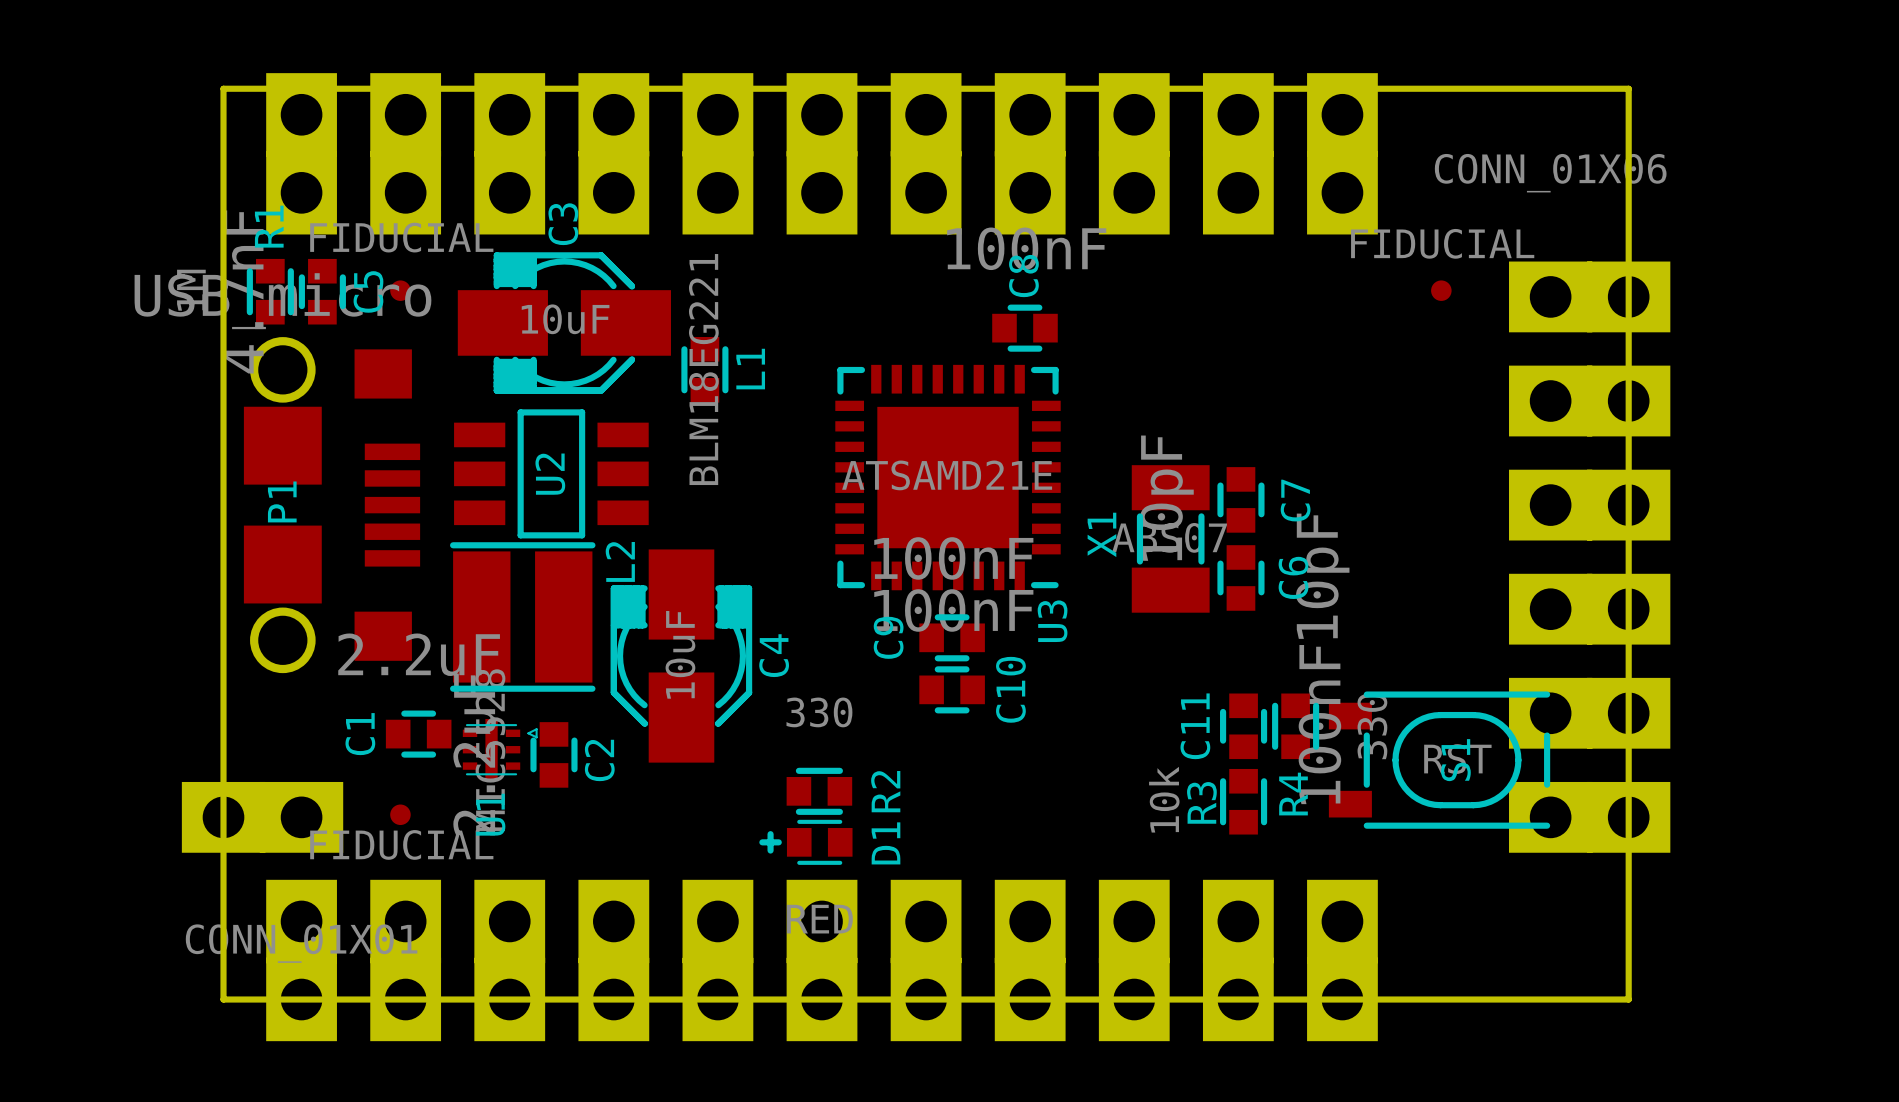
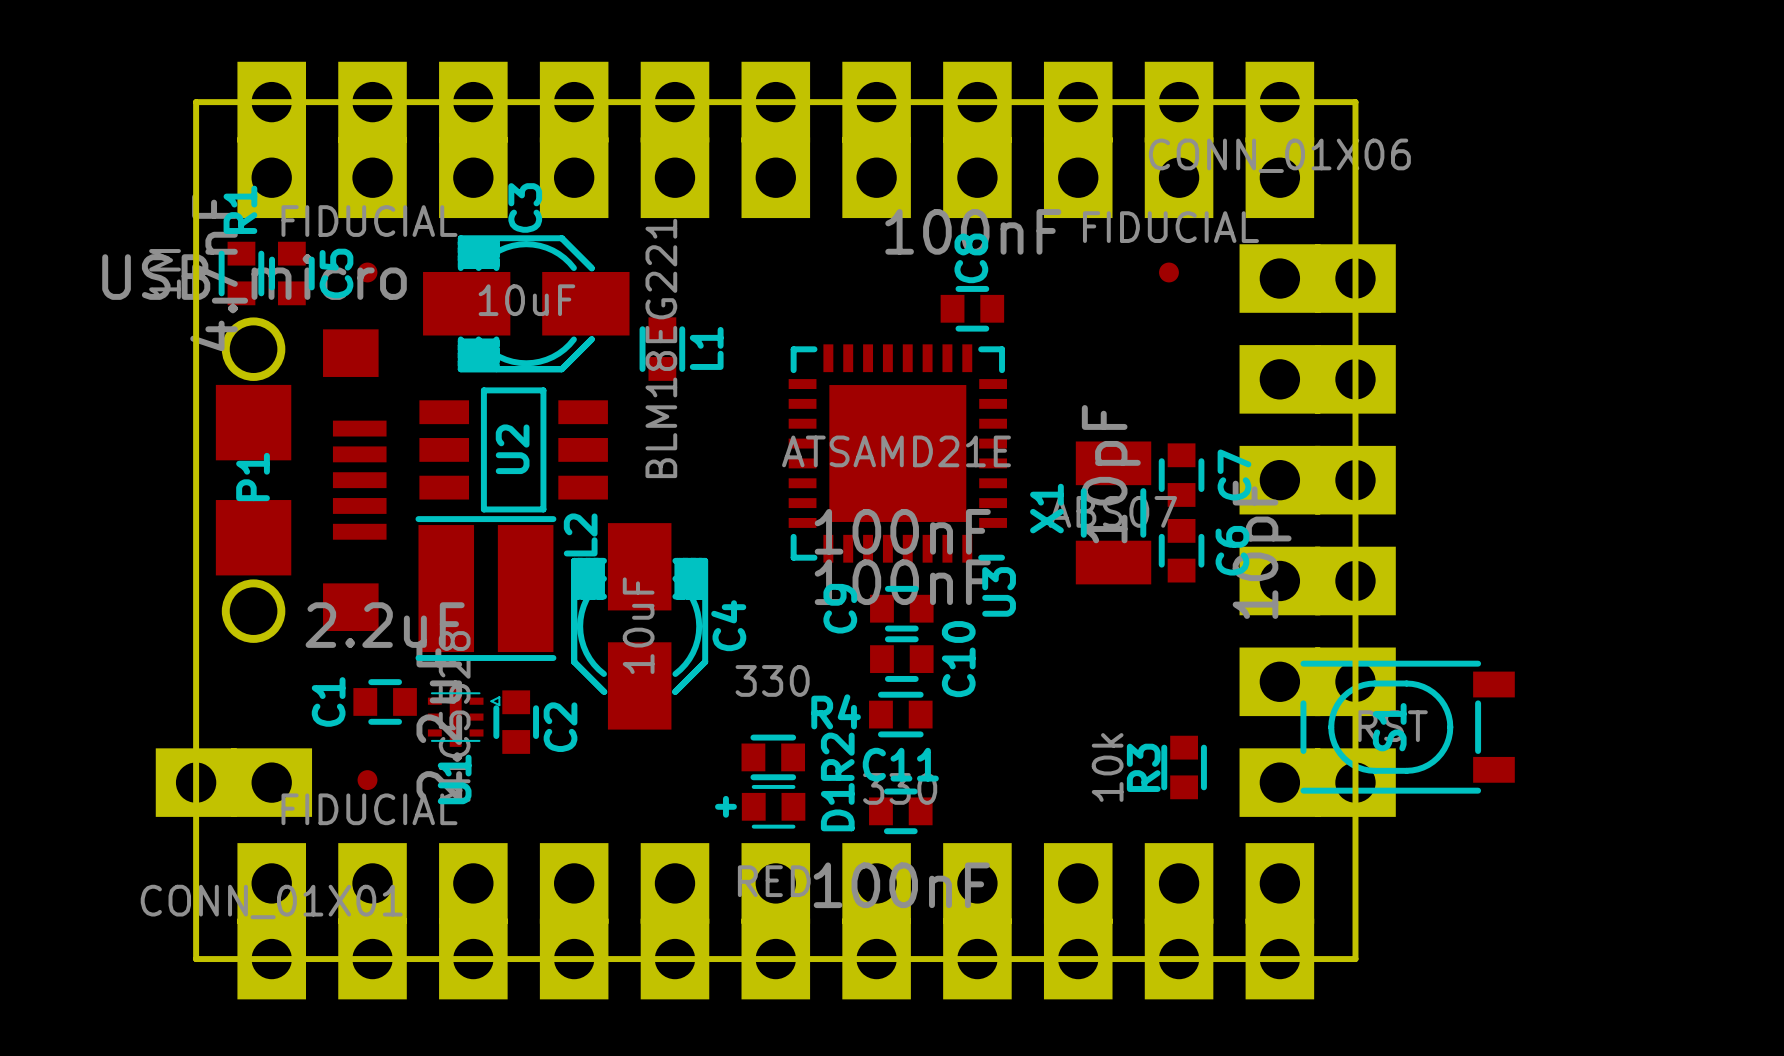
board edge: (223, 114) (223, 88) (1628, 88) (1628, 999) (1420, 999) -> (196, 102) (1355, 102) (1355, 959)
part position: (1441, 290) -> (1168, 272)
part position: (1589, 557) -> (1317, 530)
C11 rotation: 0° (1243, 726) -> 90° clockwise (900, 811)
C11 position: (1243, 726) -> (900, 811)
R4 rotation: 0° (1295, 726) -> 90° clockwise (900, 714)
R4 position: (1295, 726) -> (900, 714)

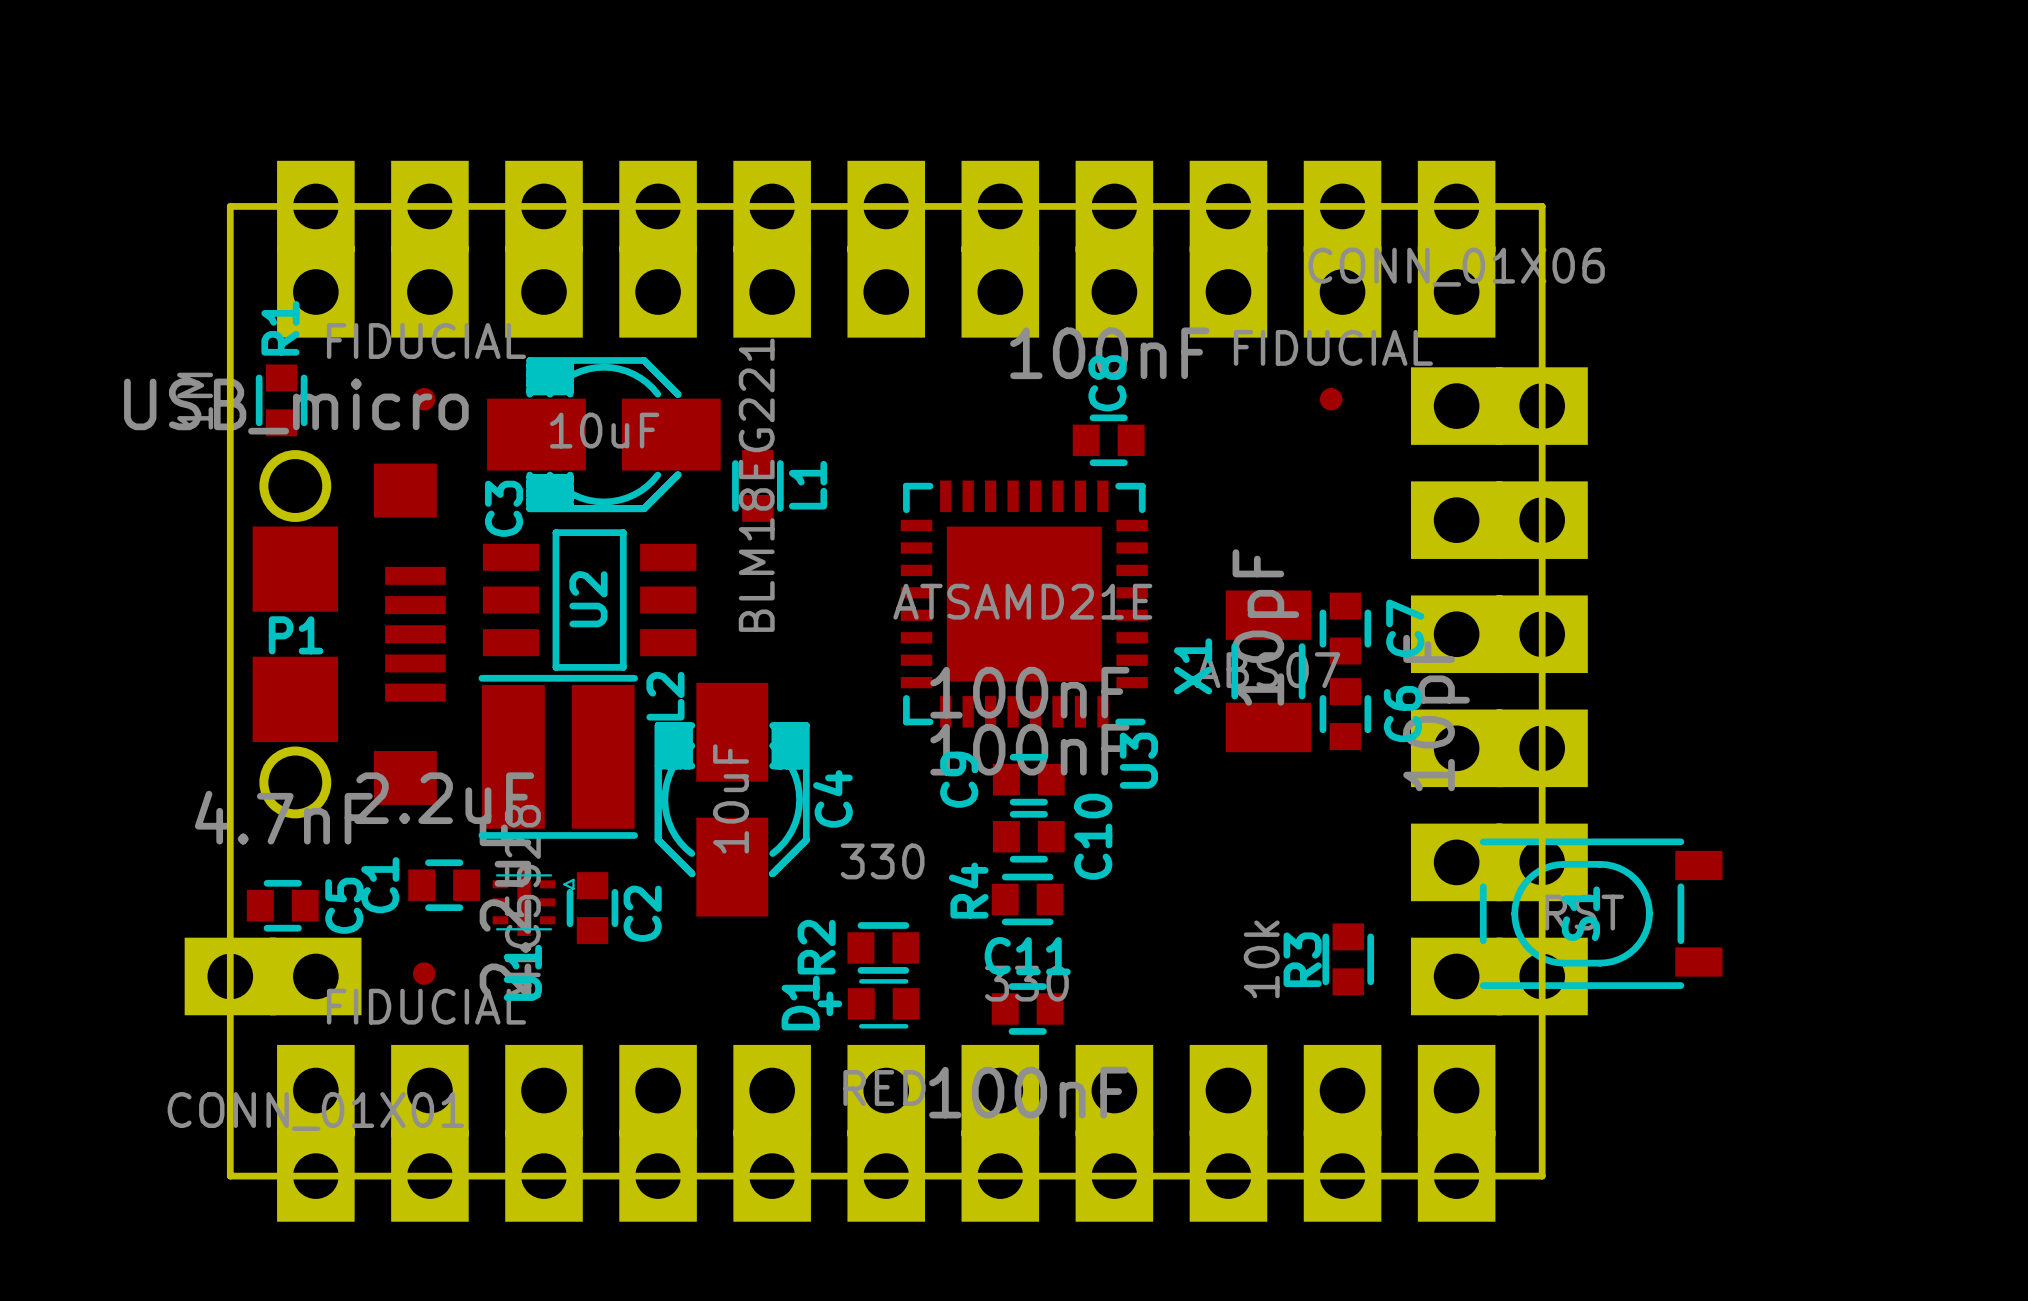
C3 name position: C3 (525, 207) -> C3 (504, 508)
C5 rotation: 0° (291, 273) -> 90° clockwise (282, 905)
C5 position: (291, 273) -> (282, 905)
P1 name rotation: 0° (253, 476) -> 90° clockwise (296, 635)
R4 name rotation: 0° (836, 711) -> 90° counterclockwise (968, 890)
R2 name position: R2 (837, 756) -> R2 (816, 947)
D1 name position: D1 (837, 807) -> D1 (800, 1003)

